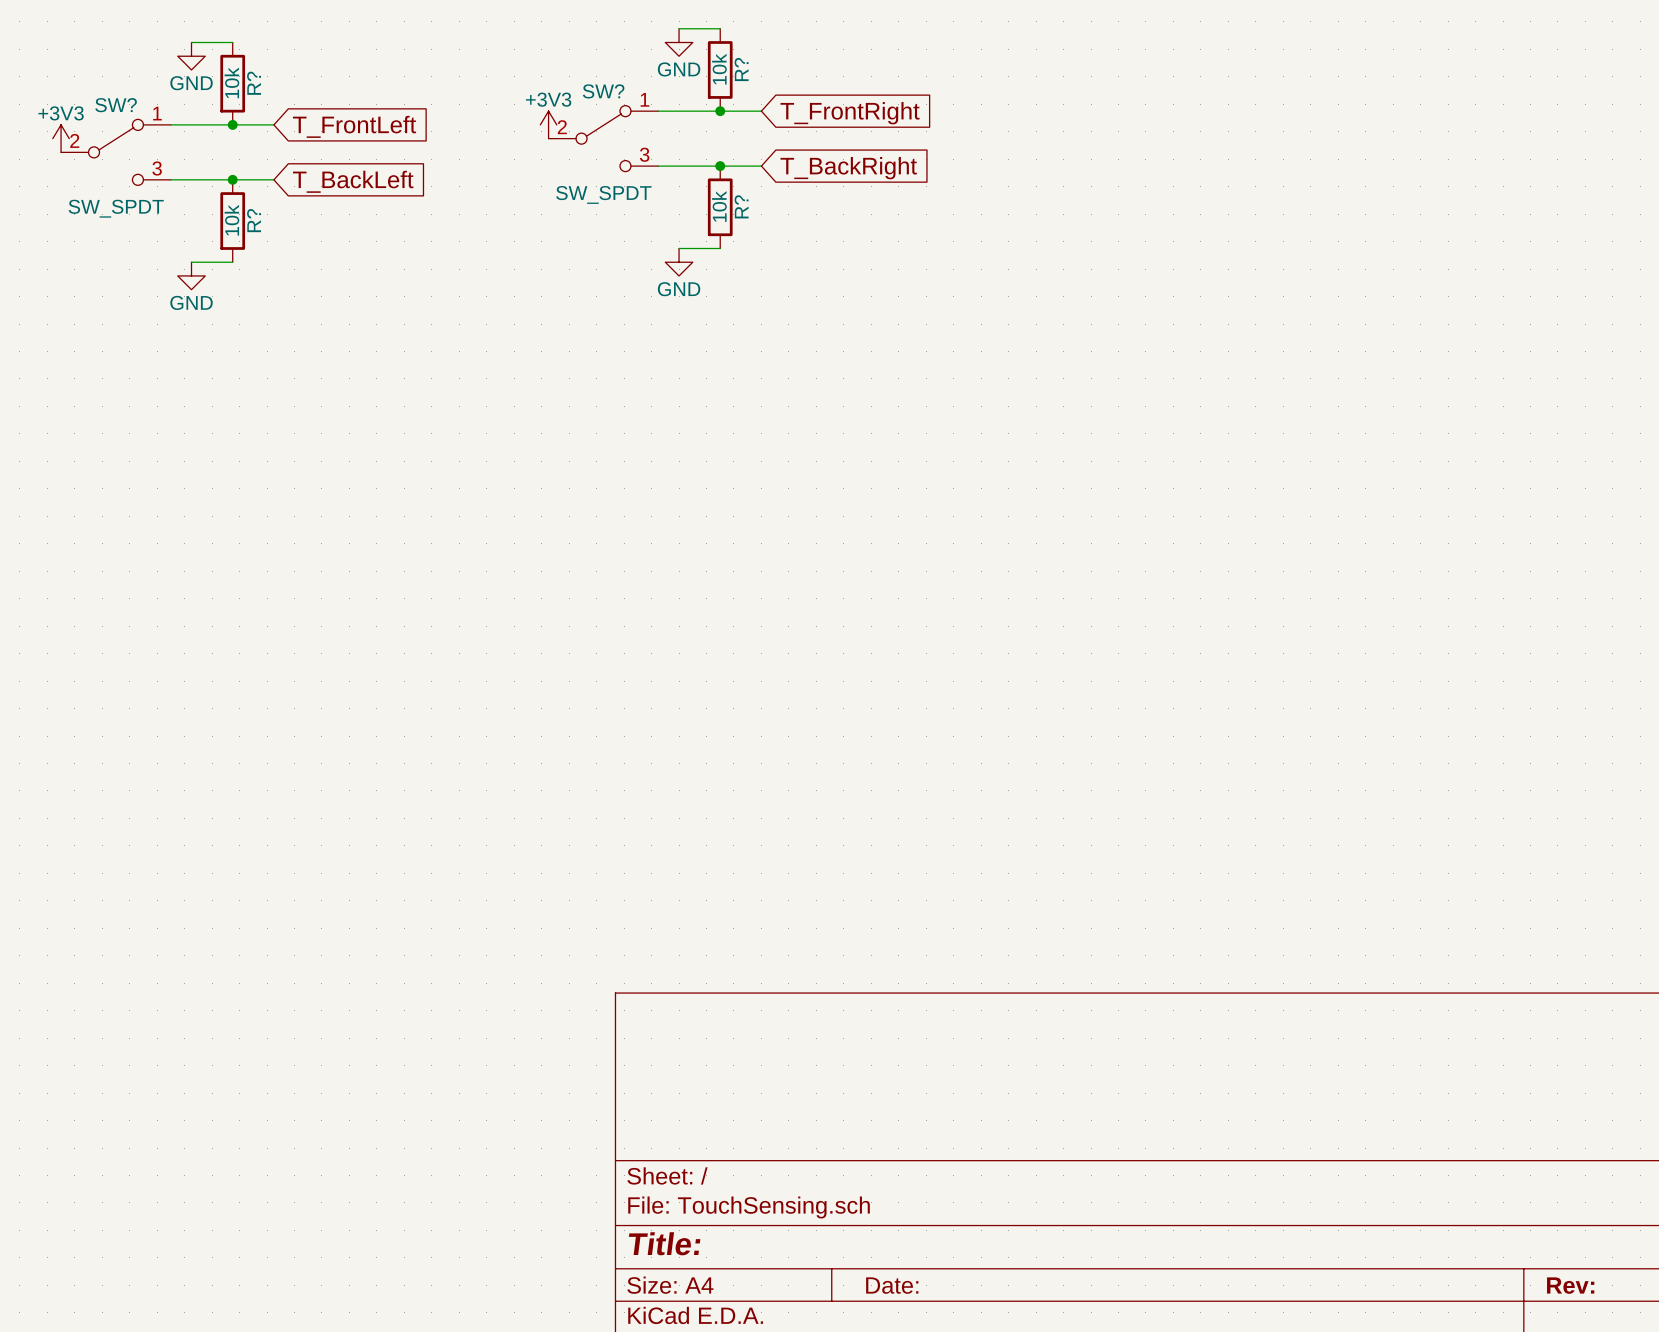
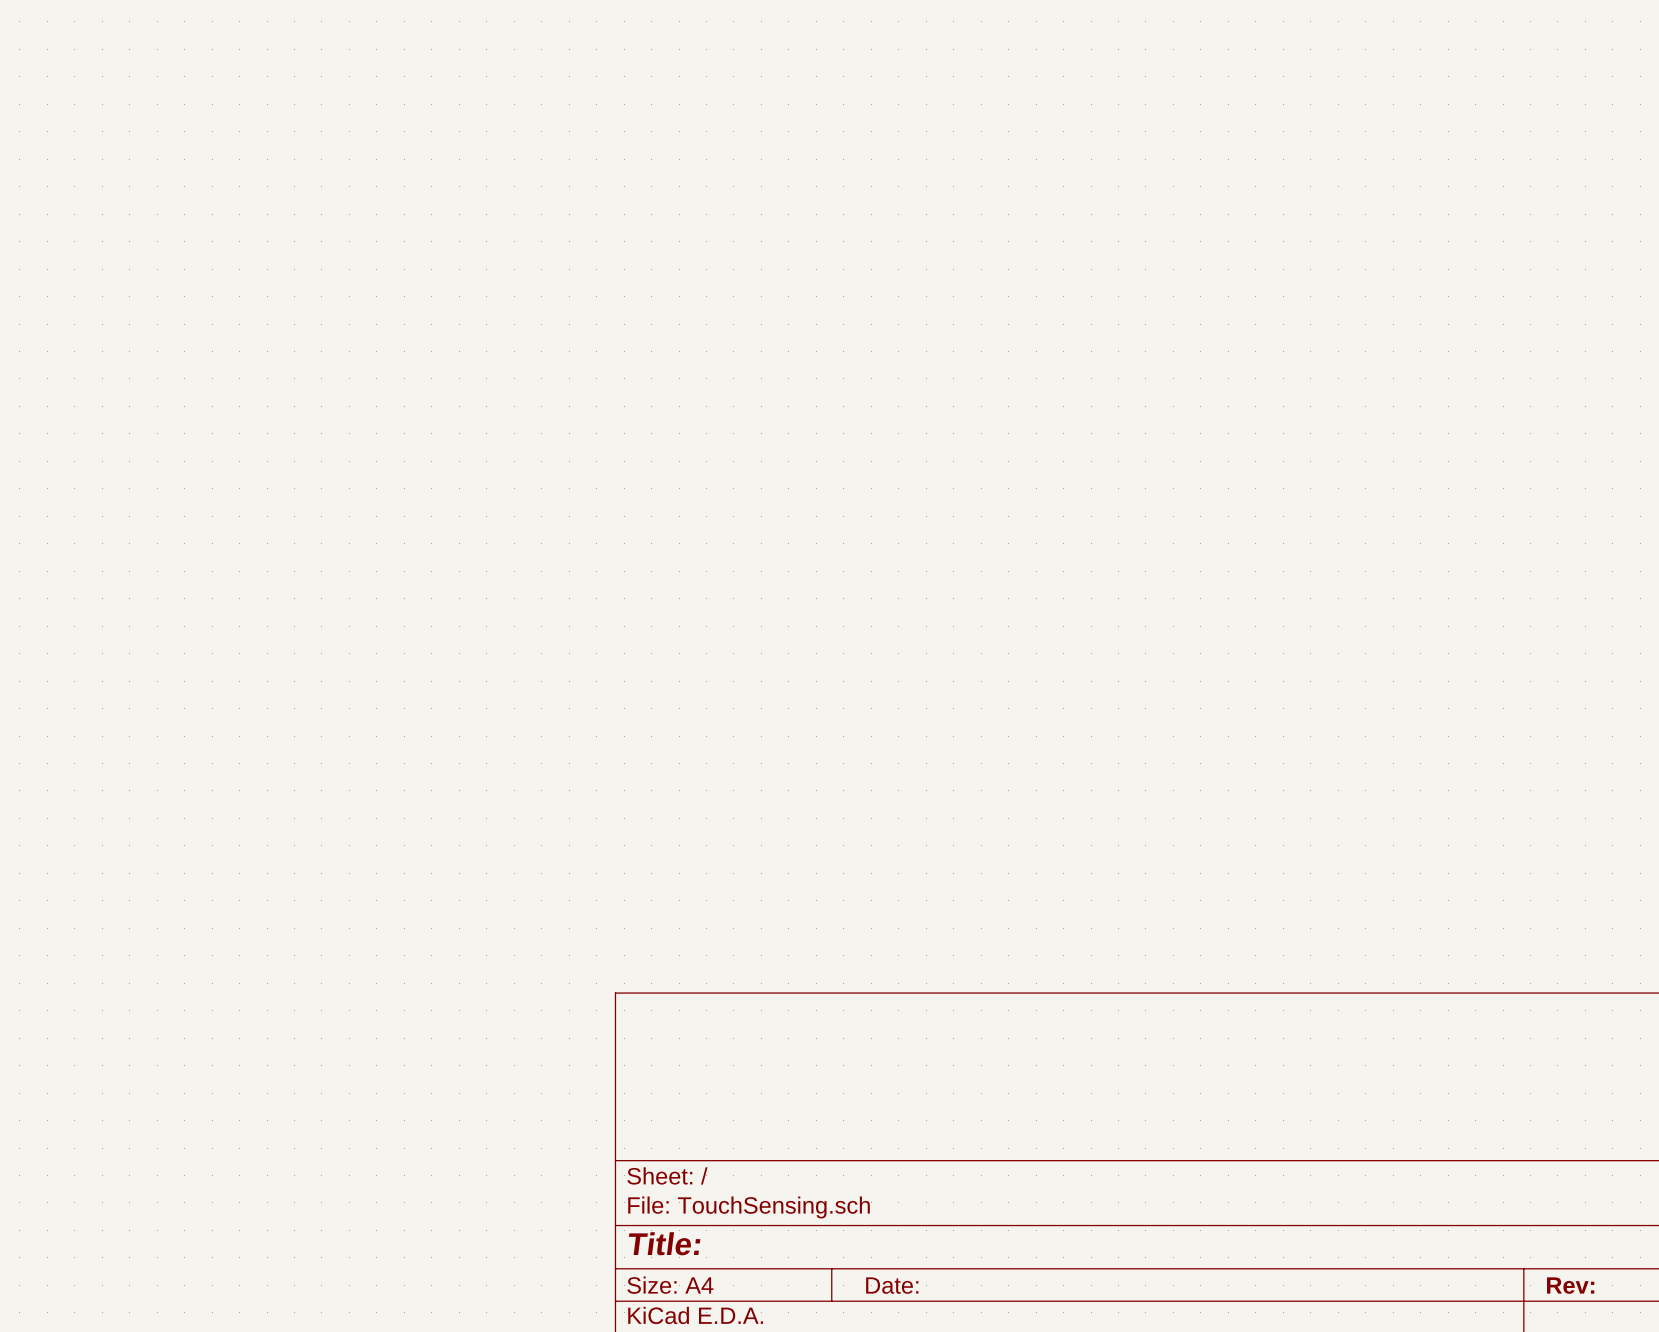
wire: (679, 28) (720, 28) -> none
wire: (191, 42) (232, 42) -> none
power symbol: GND (679, 42) -> none
power symbol: GND (191, 56) -> none
R?: 10k (720, 69) -> none
R?: 10k (232, 83) -> none
wire: (658, 111) (761, 111) -> none
junction: (720, 111) -> none
global label: T_FrontRight (850, 113) -> none
wire: (170, 124) (273, 124) -> none
junction: (232, 124) -> none
power symbol: +3V3 (548, 124) -> none
global label: T_FrontLeft (354, 126) -> none
power symbol: +3V3 (61, 138) -> none
SW?: SW_SPDT (603, 138) -> none
SW?: SW_SPDT (115, 152) -> none
wire: (658, 166) (761, 166) -> none
junction: (720, 166) -> none
global label: T_BackRight (848, 168) -> none
wire: (170, 179) (273, 179) -> none
junction: (232, 179) -> none
global label: T_BackLeft (353, 181) -> none
R?: 10k (720, 207) -> none
R?: 10k (232, 221) -> none
wire: (679, 248) (720, 248) -> none
wire: (191, 262) (232, 262) -> none
power symbol: GND (679, 262) -> none
power symbol: GND (191, 275) -> none

